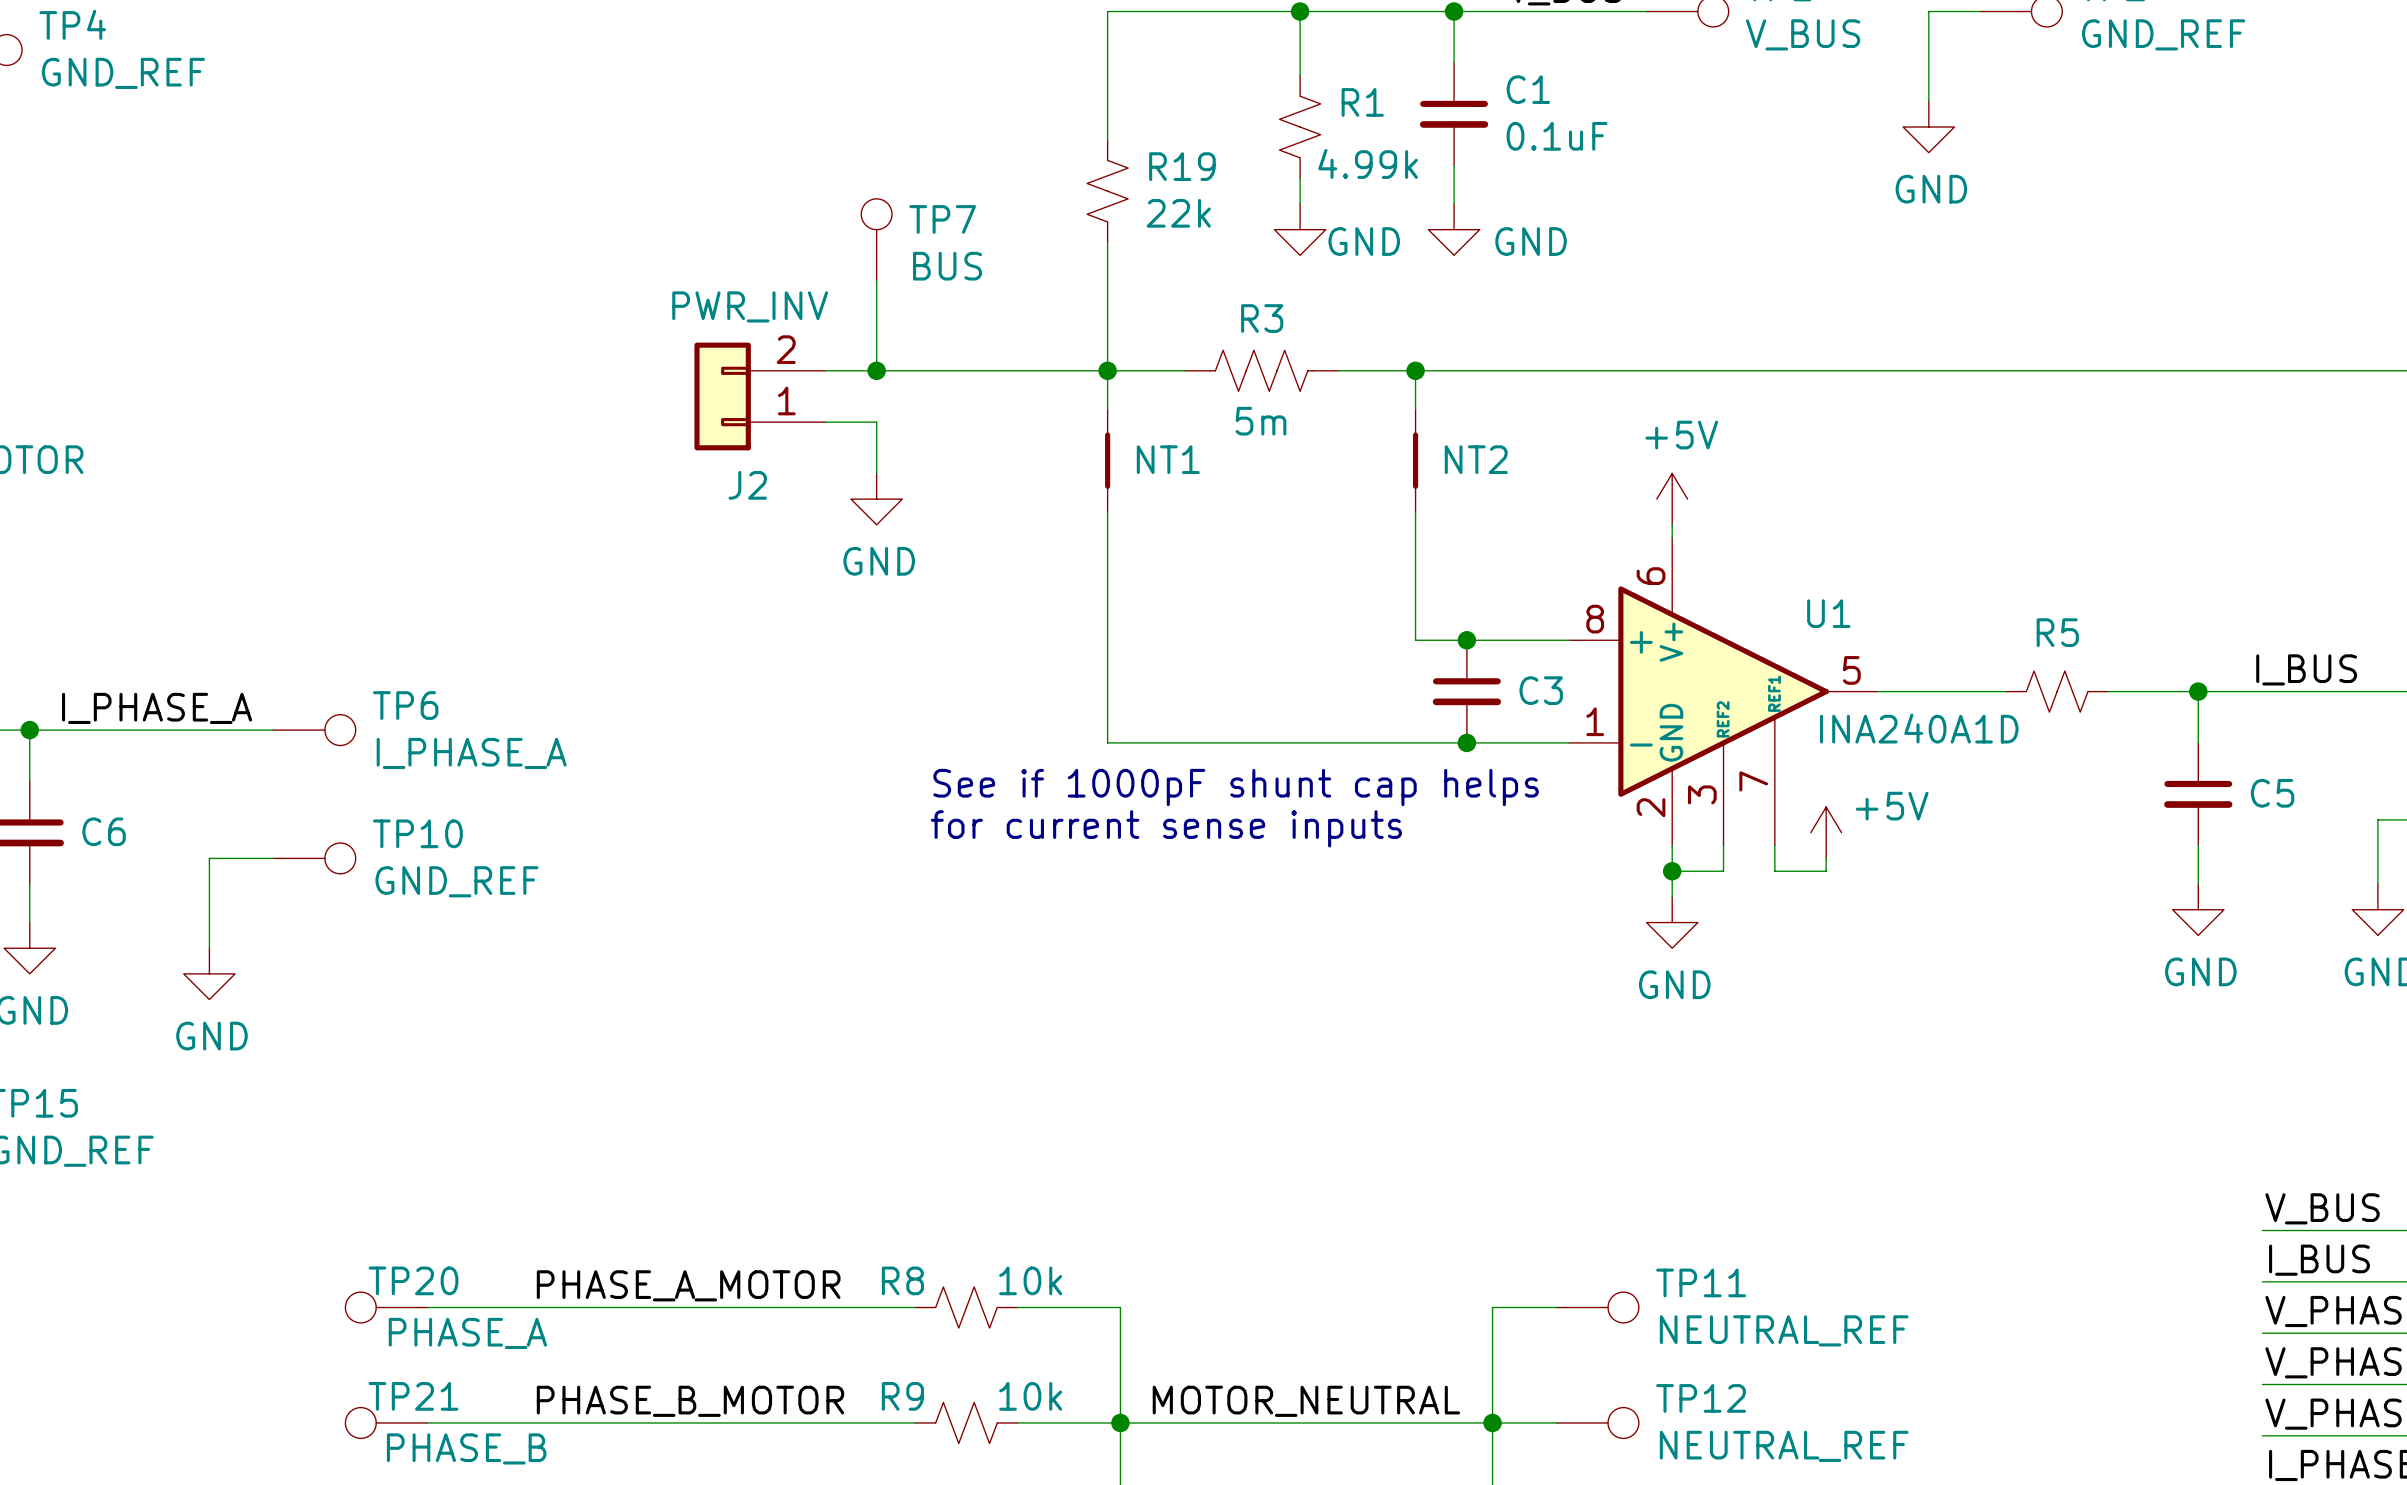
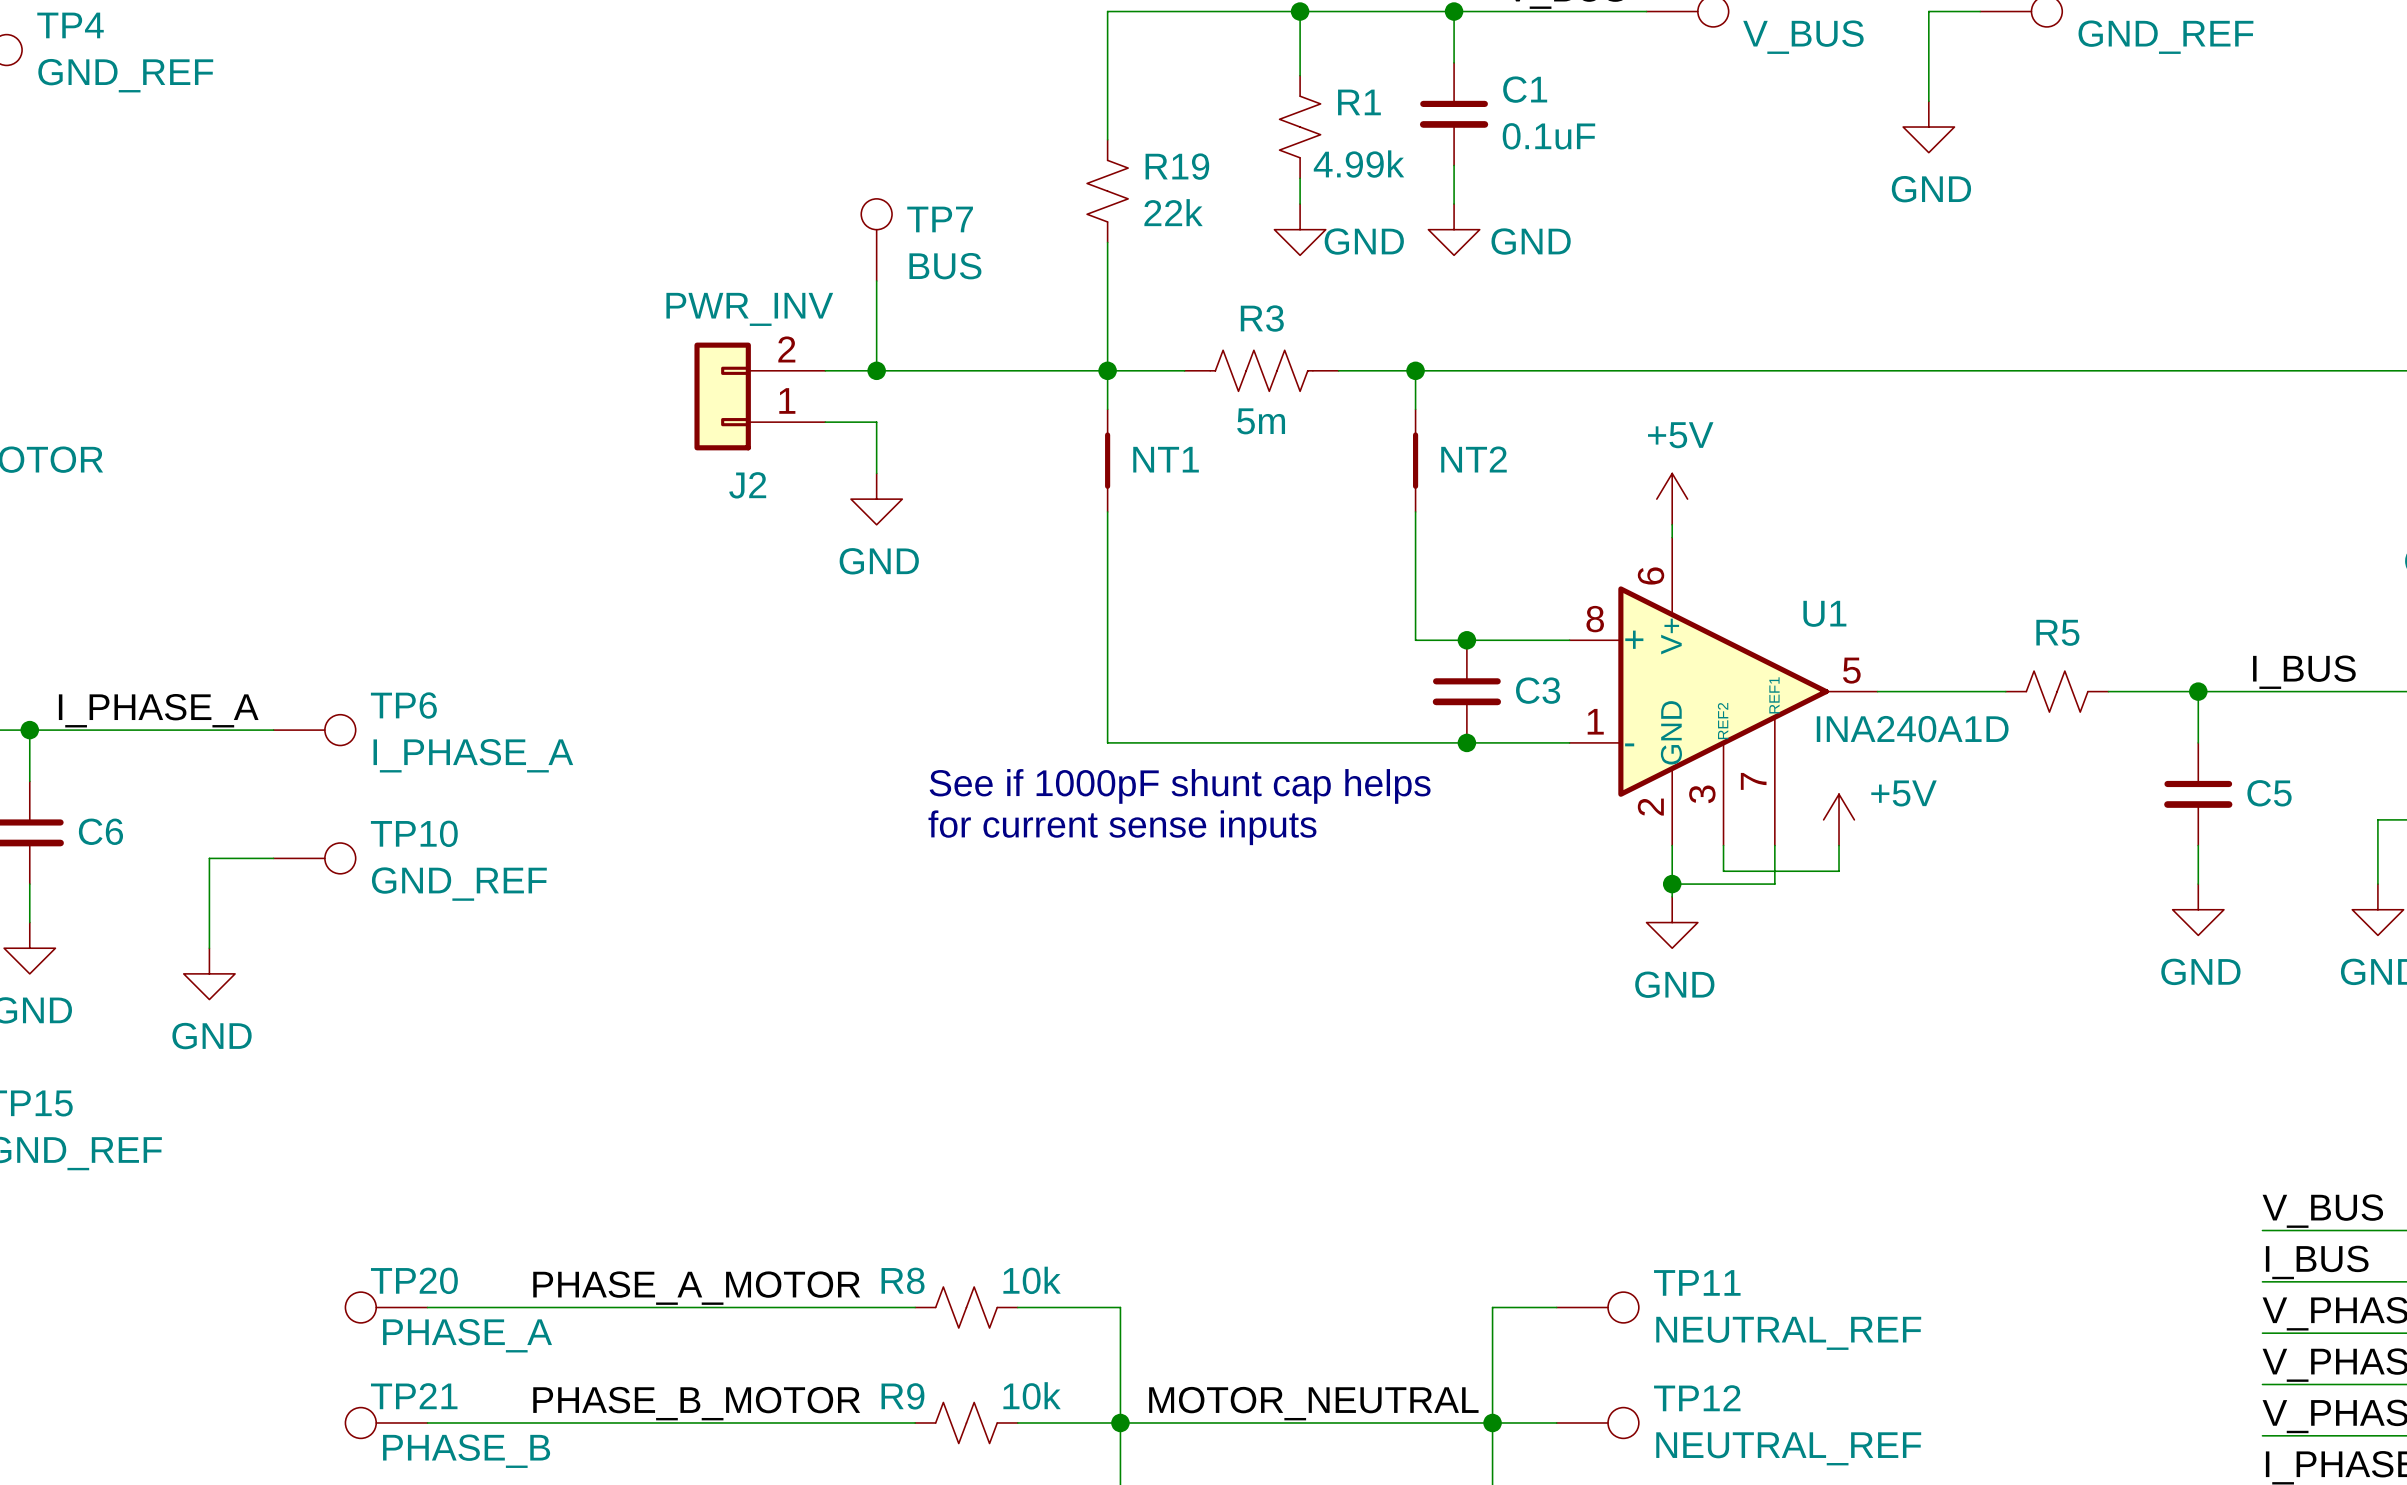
power symbol position: +5V (1826, 832) -> +5V (1839, 819)
wire: (1826, 858) (1826, 871) -> (1839, 845) (1839, 871) (1826, 871)
wire: (1672, 871) (1723, 871) -> (1672, 884) (1774, 884) (1774, 871) (1723, 871)
junction position: (1672, 871) -> (1672, 884)

